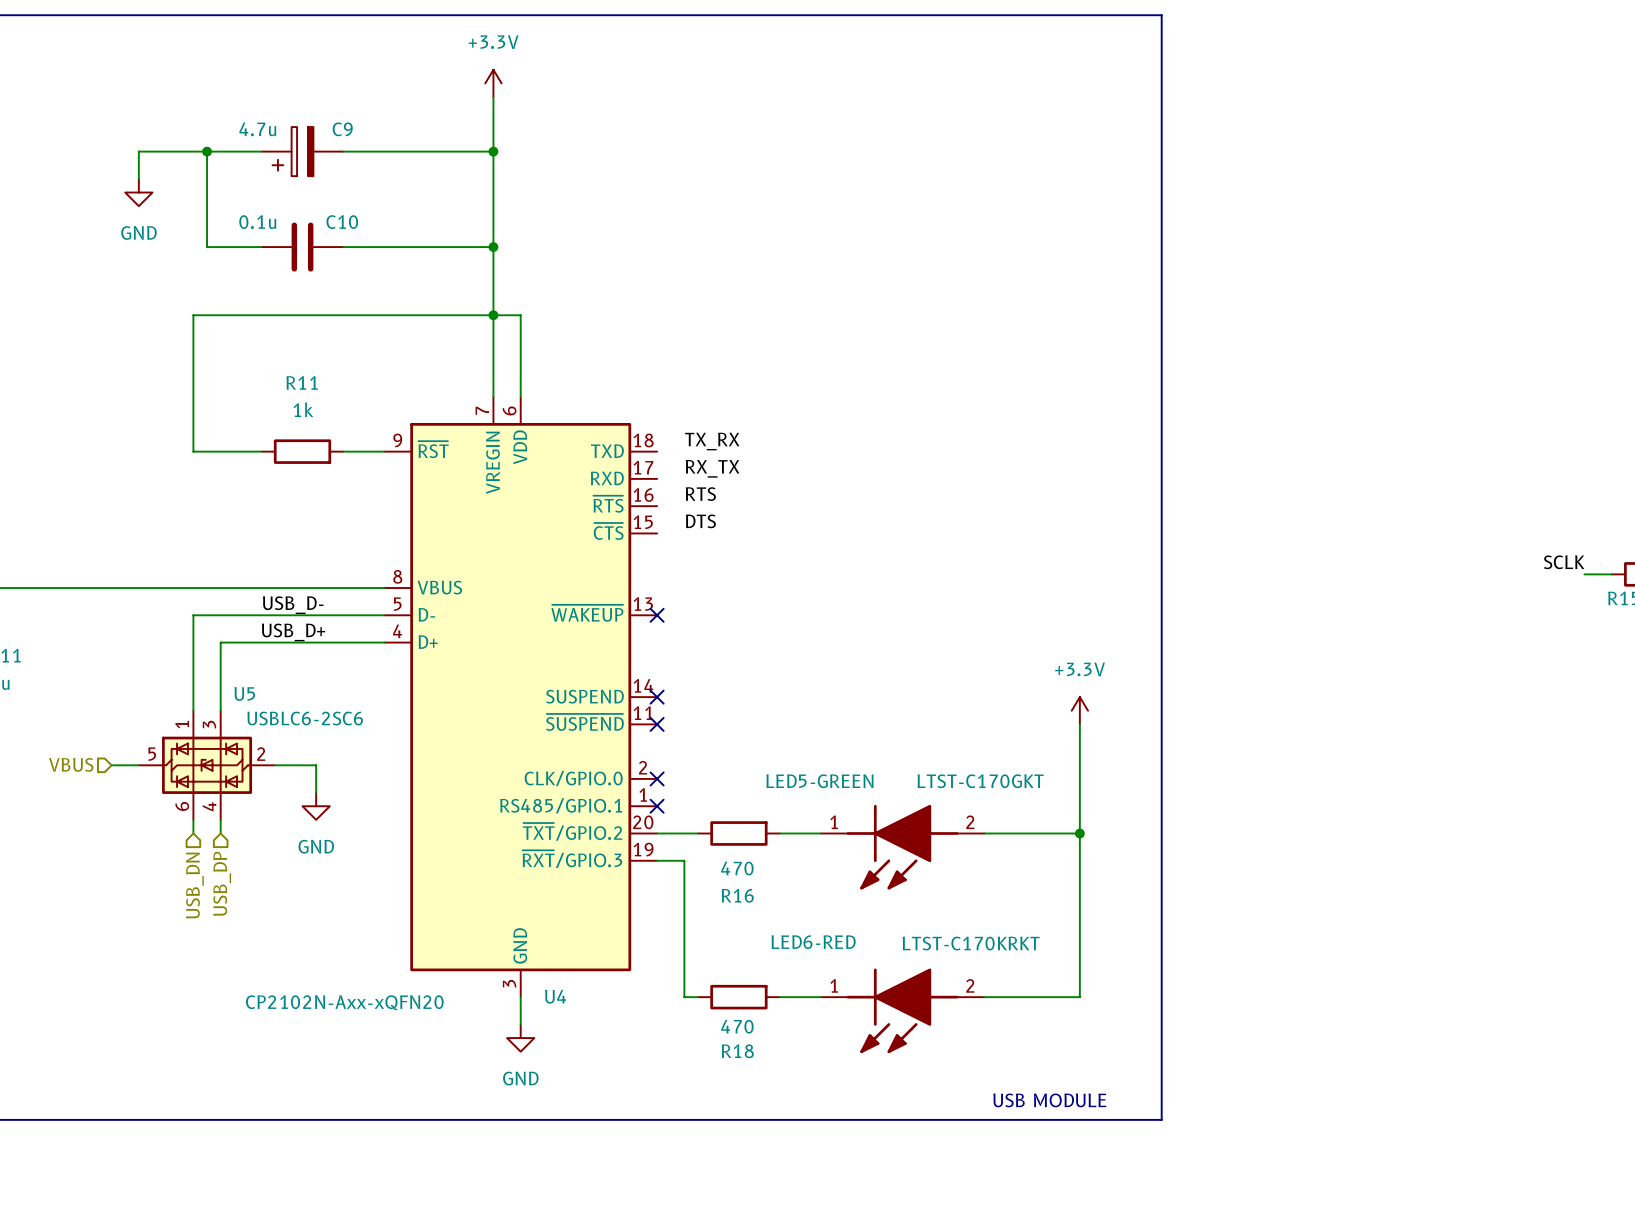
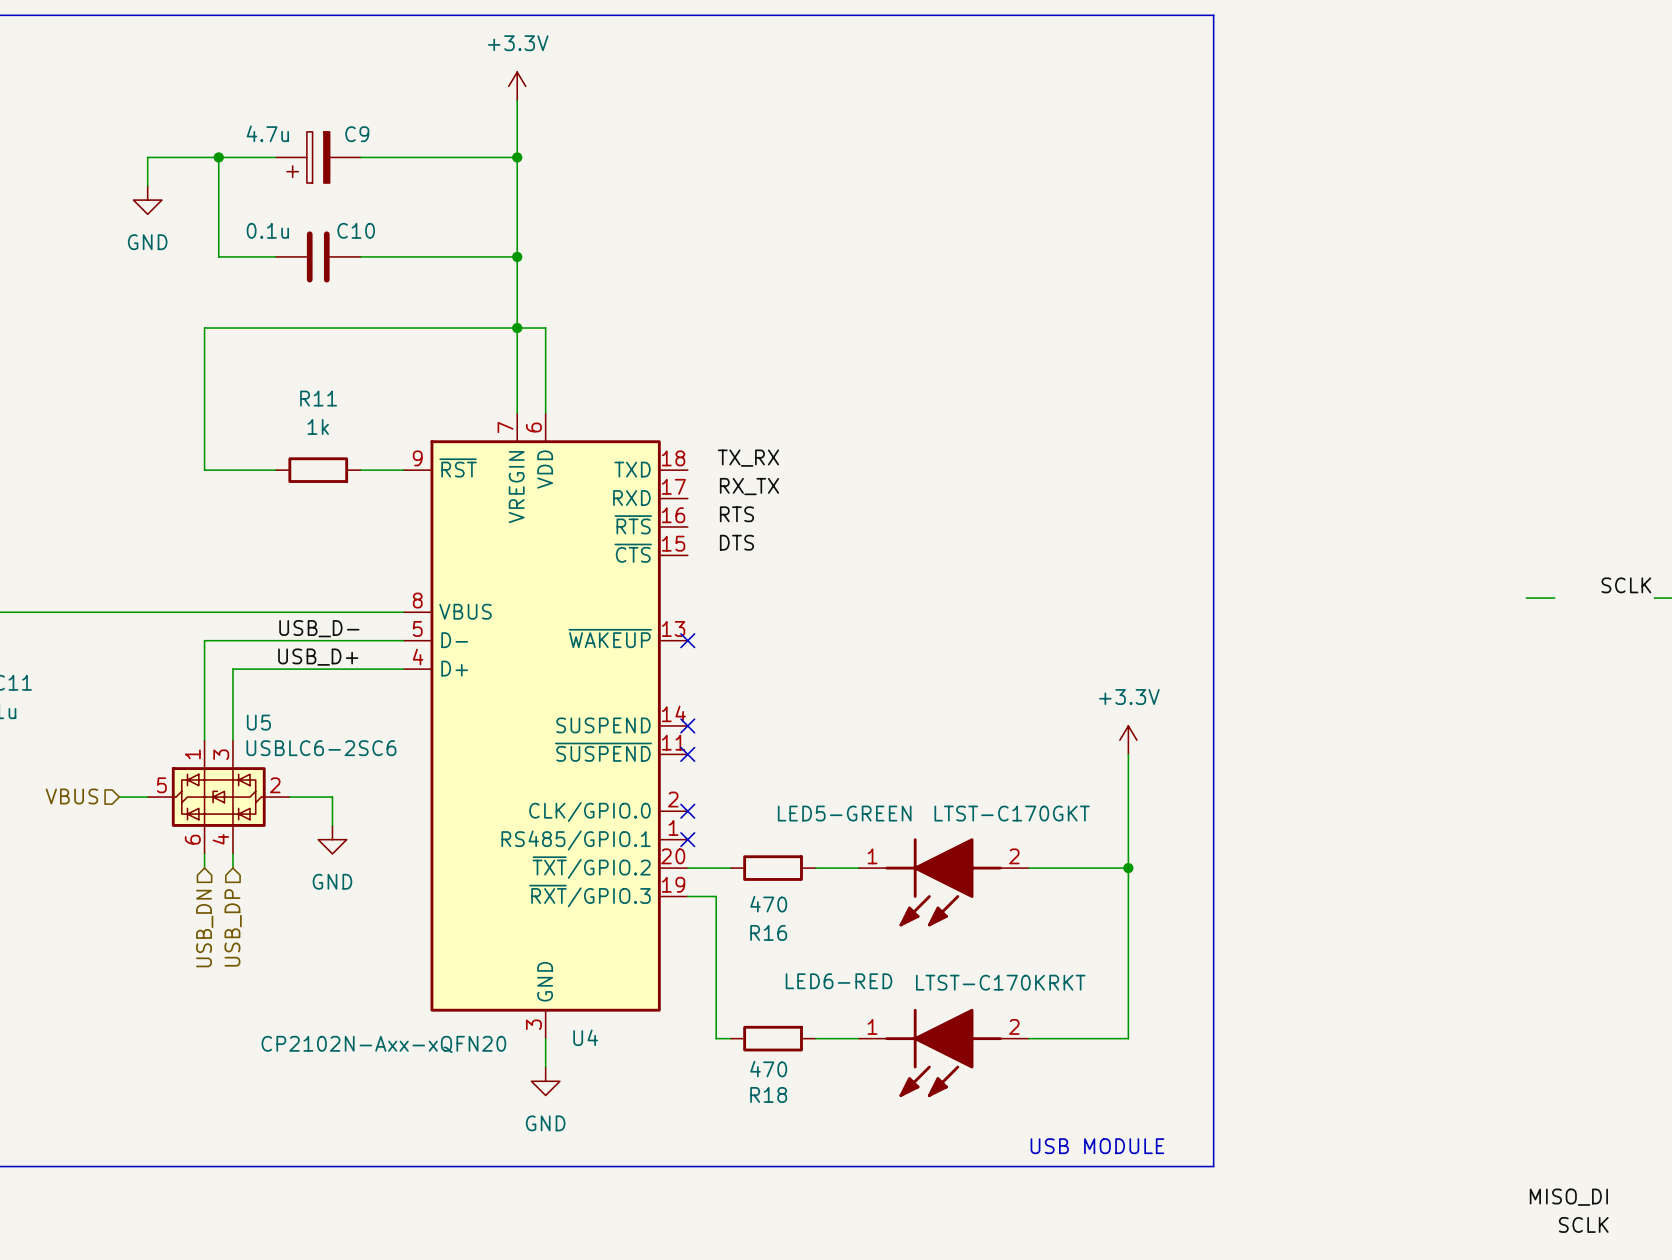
wire: none -> (1526, 598) (1554, 598)
label: none -> MISO_DI (1568, 1197)
label: none -> SCLK (1583, 1224)

